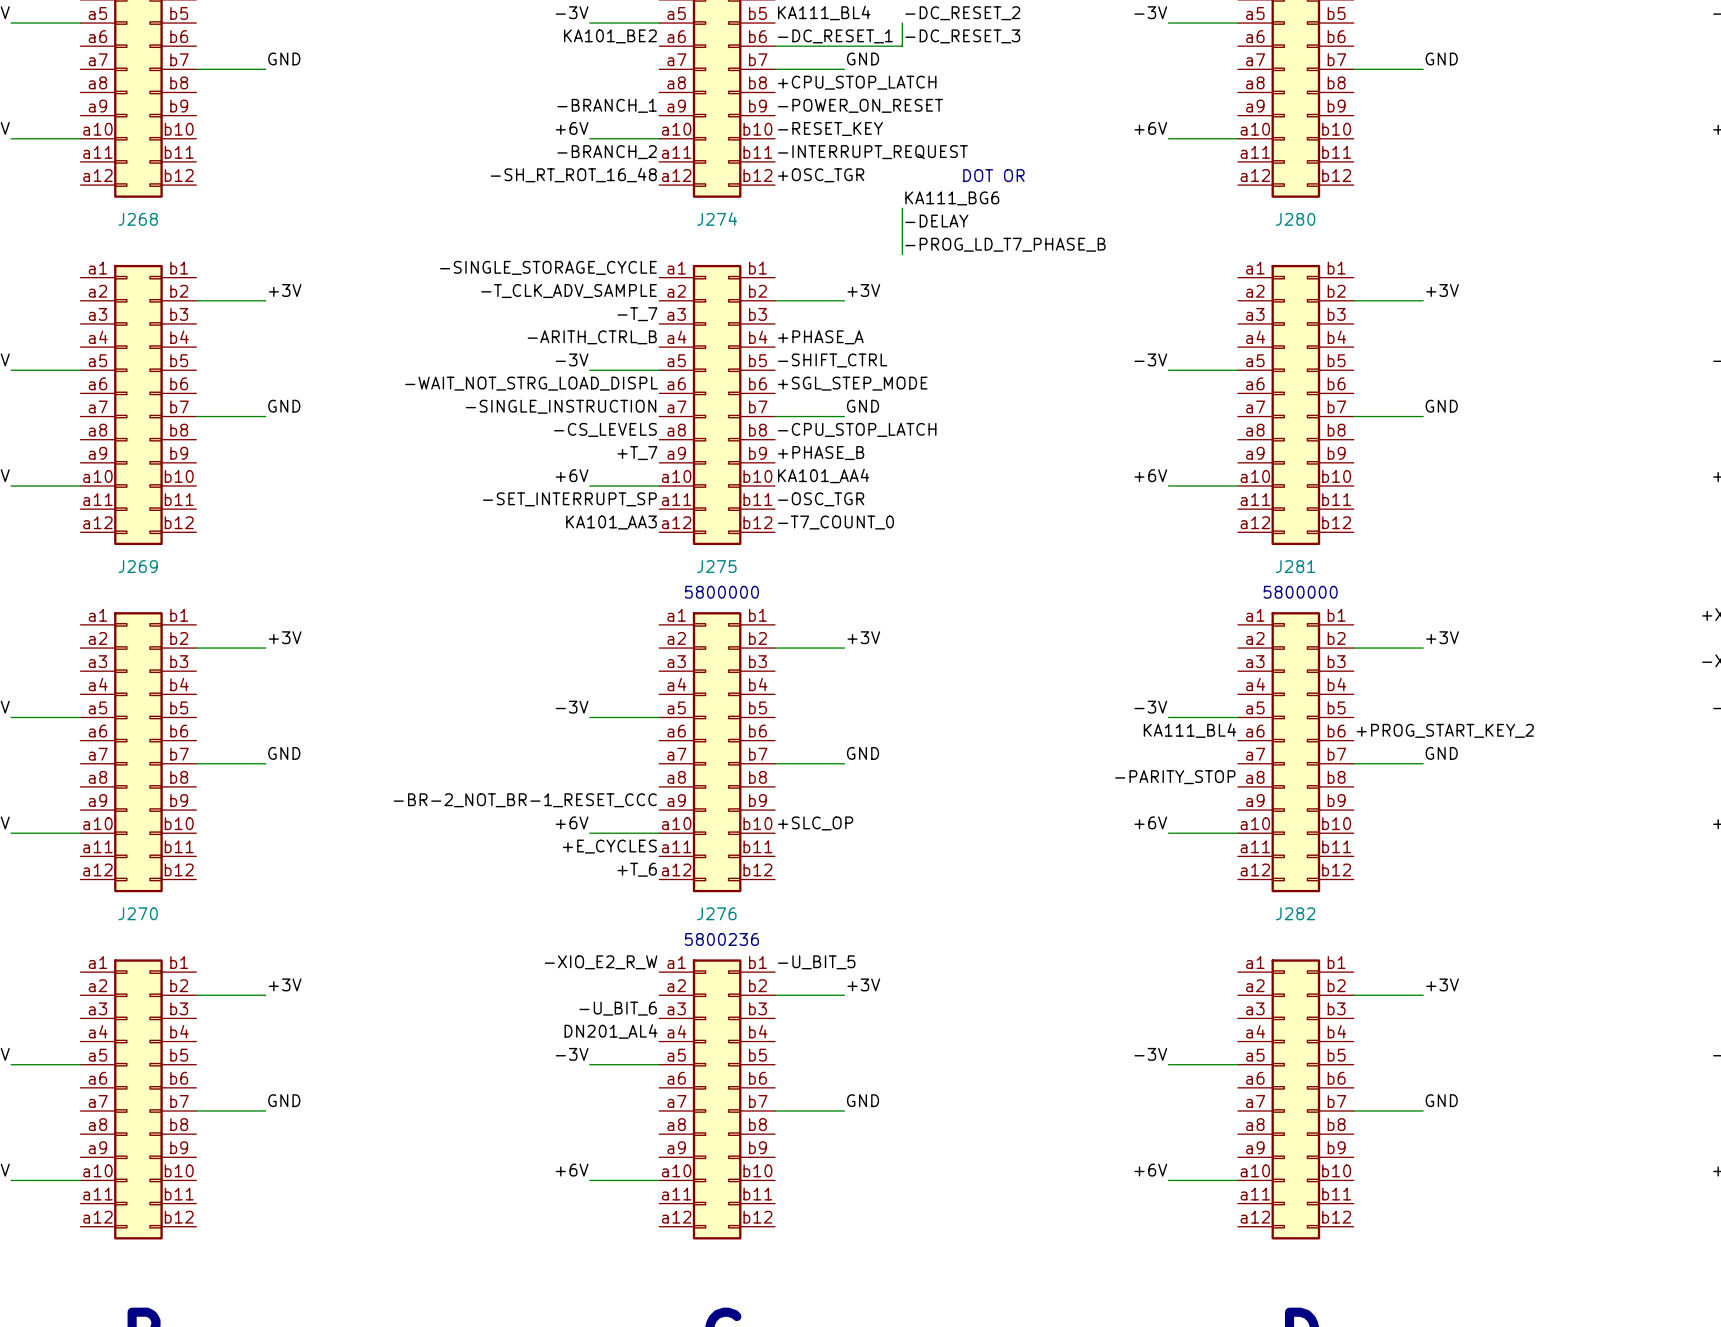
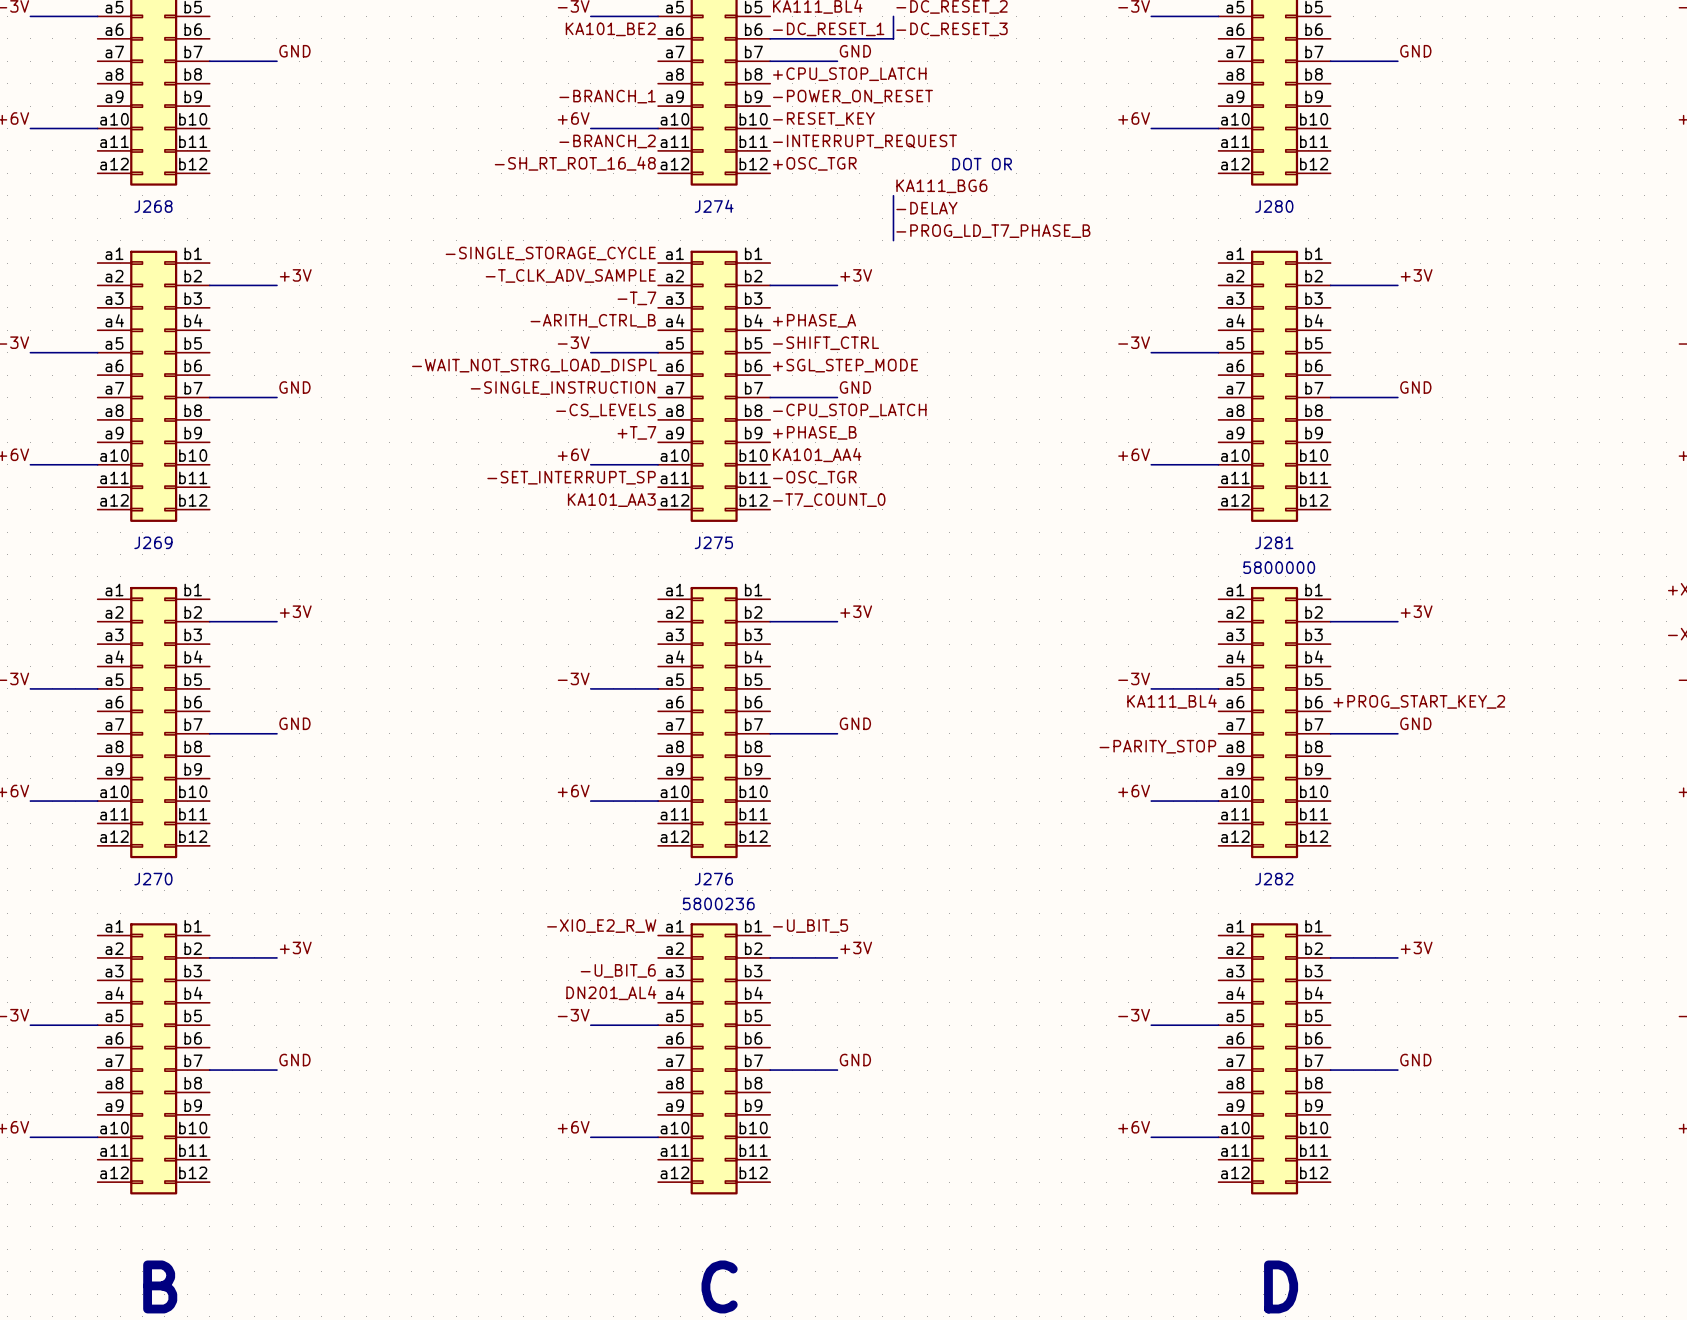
text: 5800000 (721, 592) -> none
label: -BR-2_NOT_BR-1_RESET_CCC (525, 800) -> none
label: +SLC_OP (815, 823) -> none
label: +E_CYCLES (609, 846) -> none
label: +T_6 (637, 869) -> none

